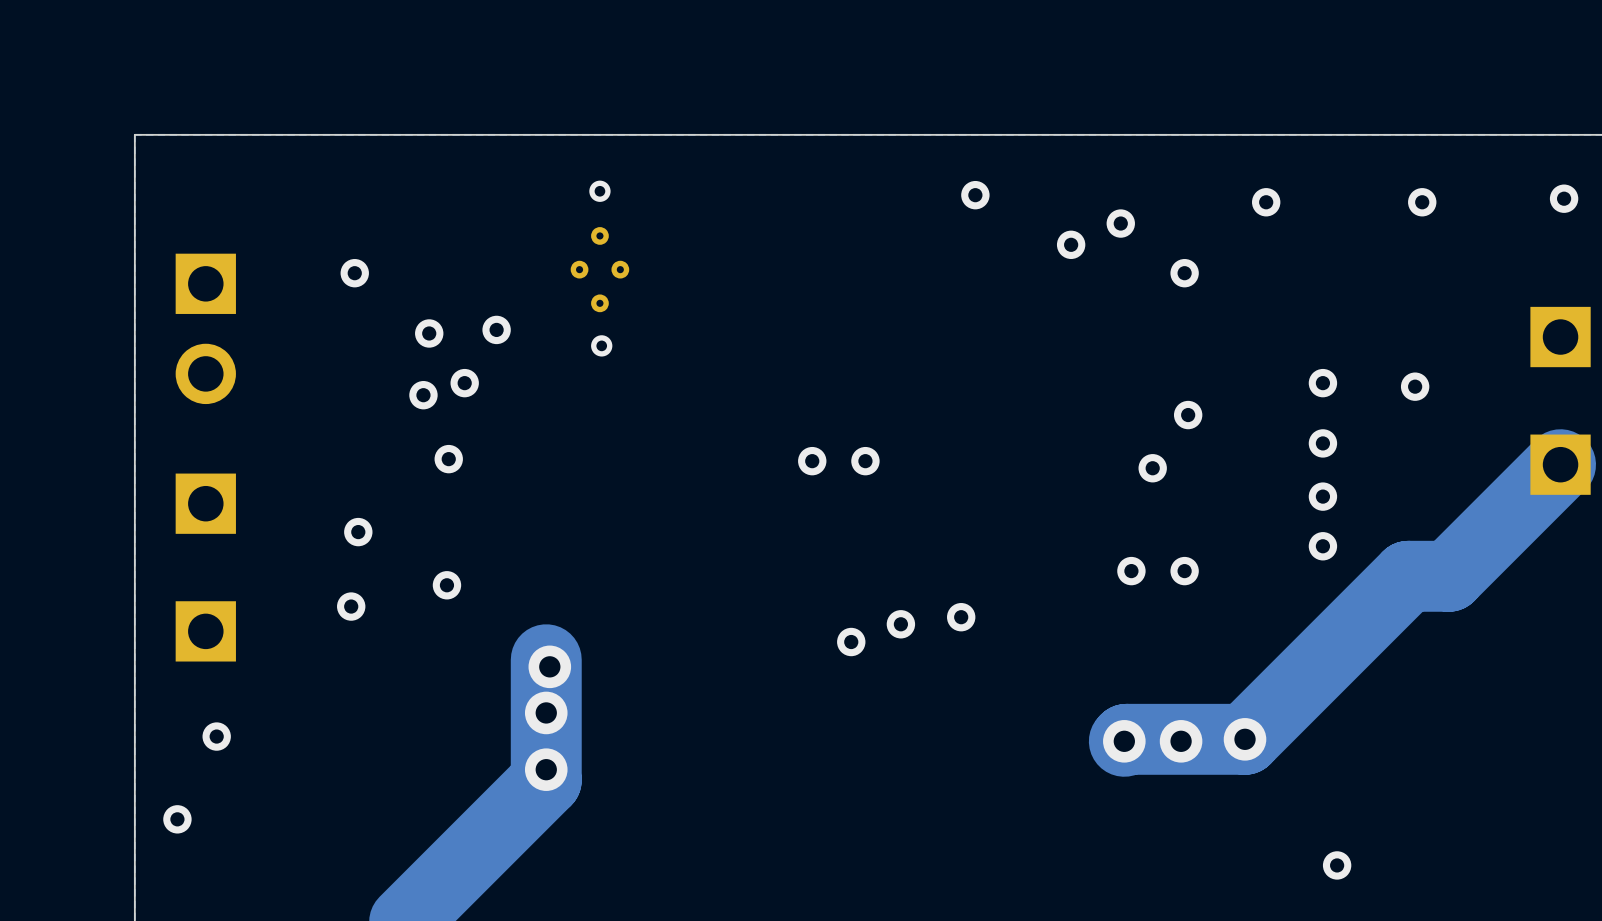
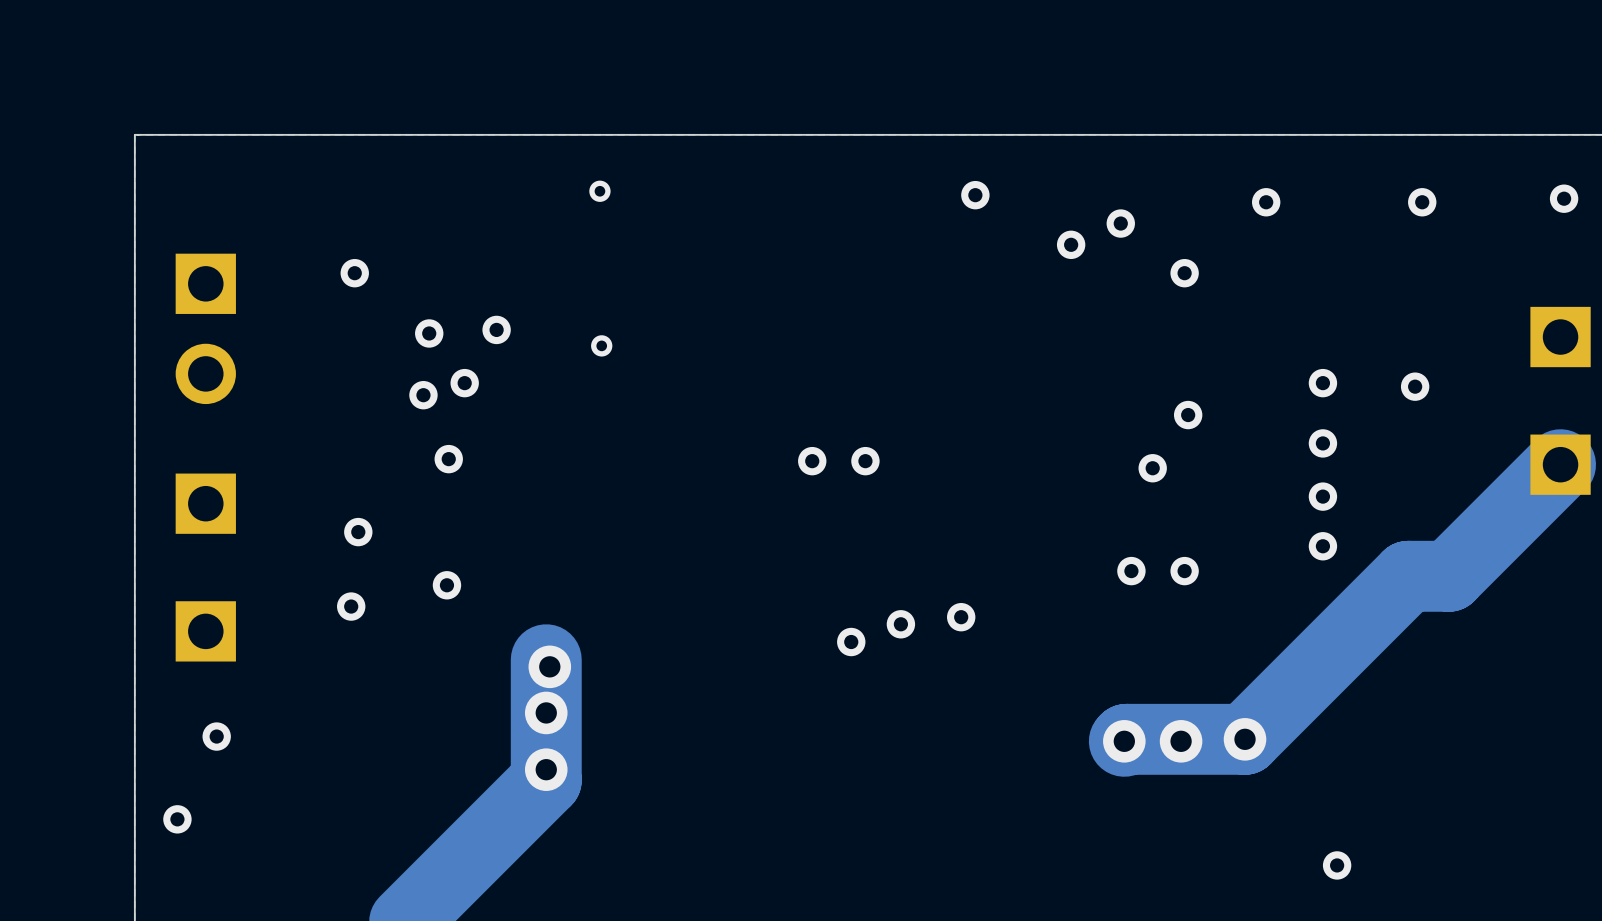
part: (599, 269) -> none

